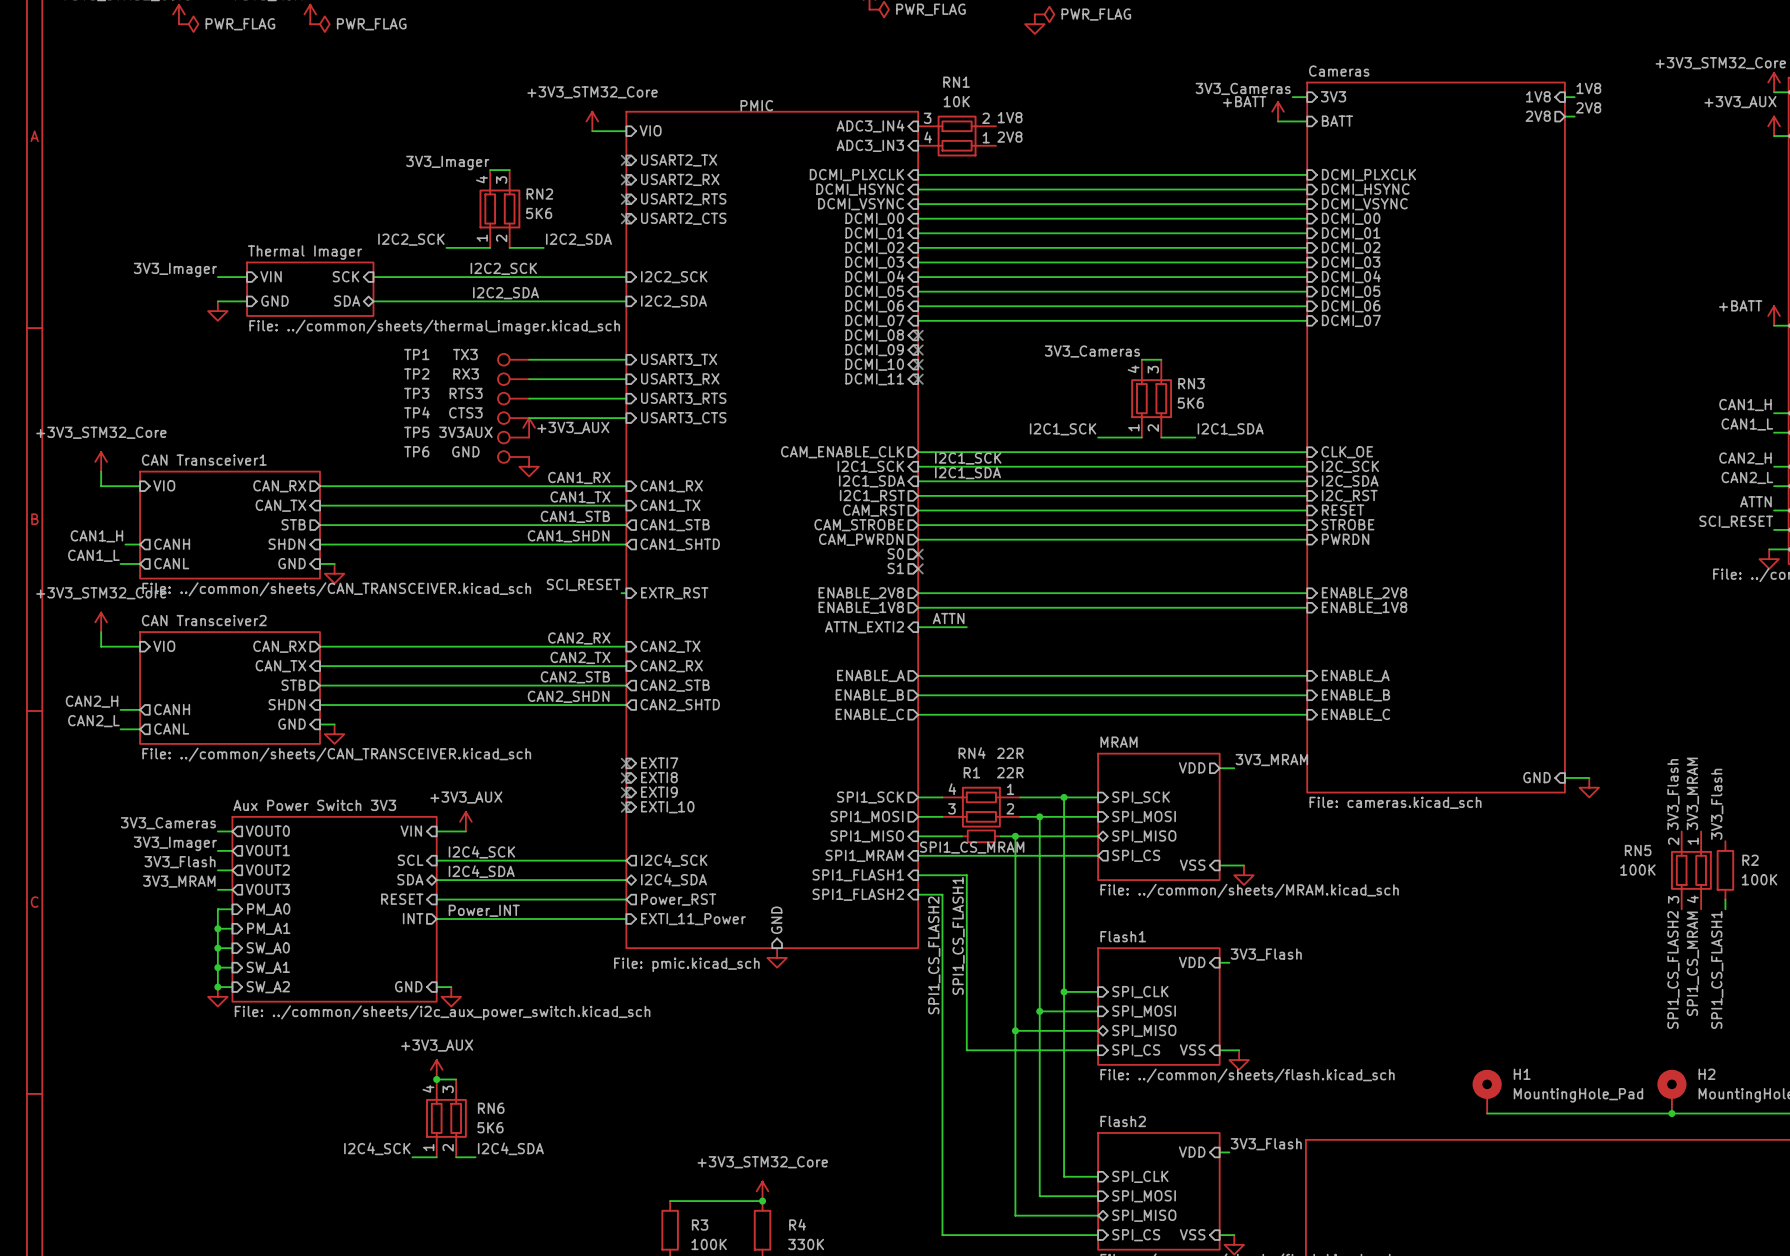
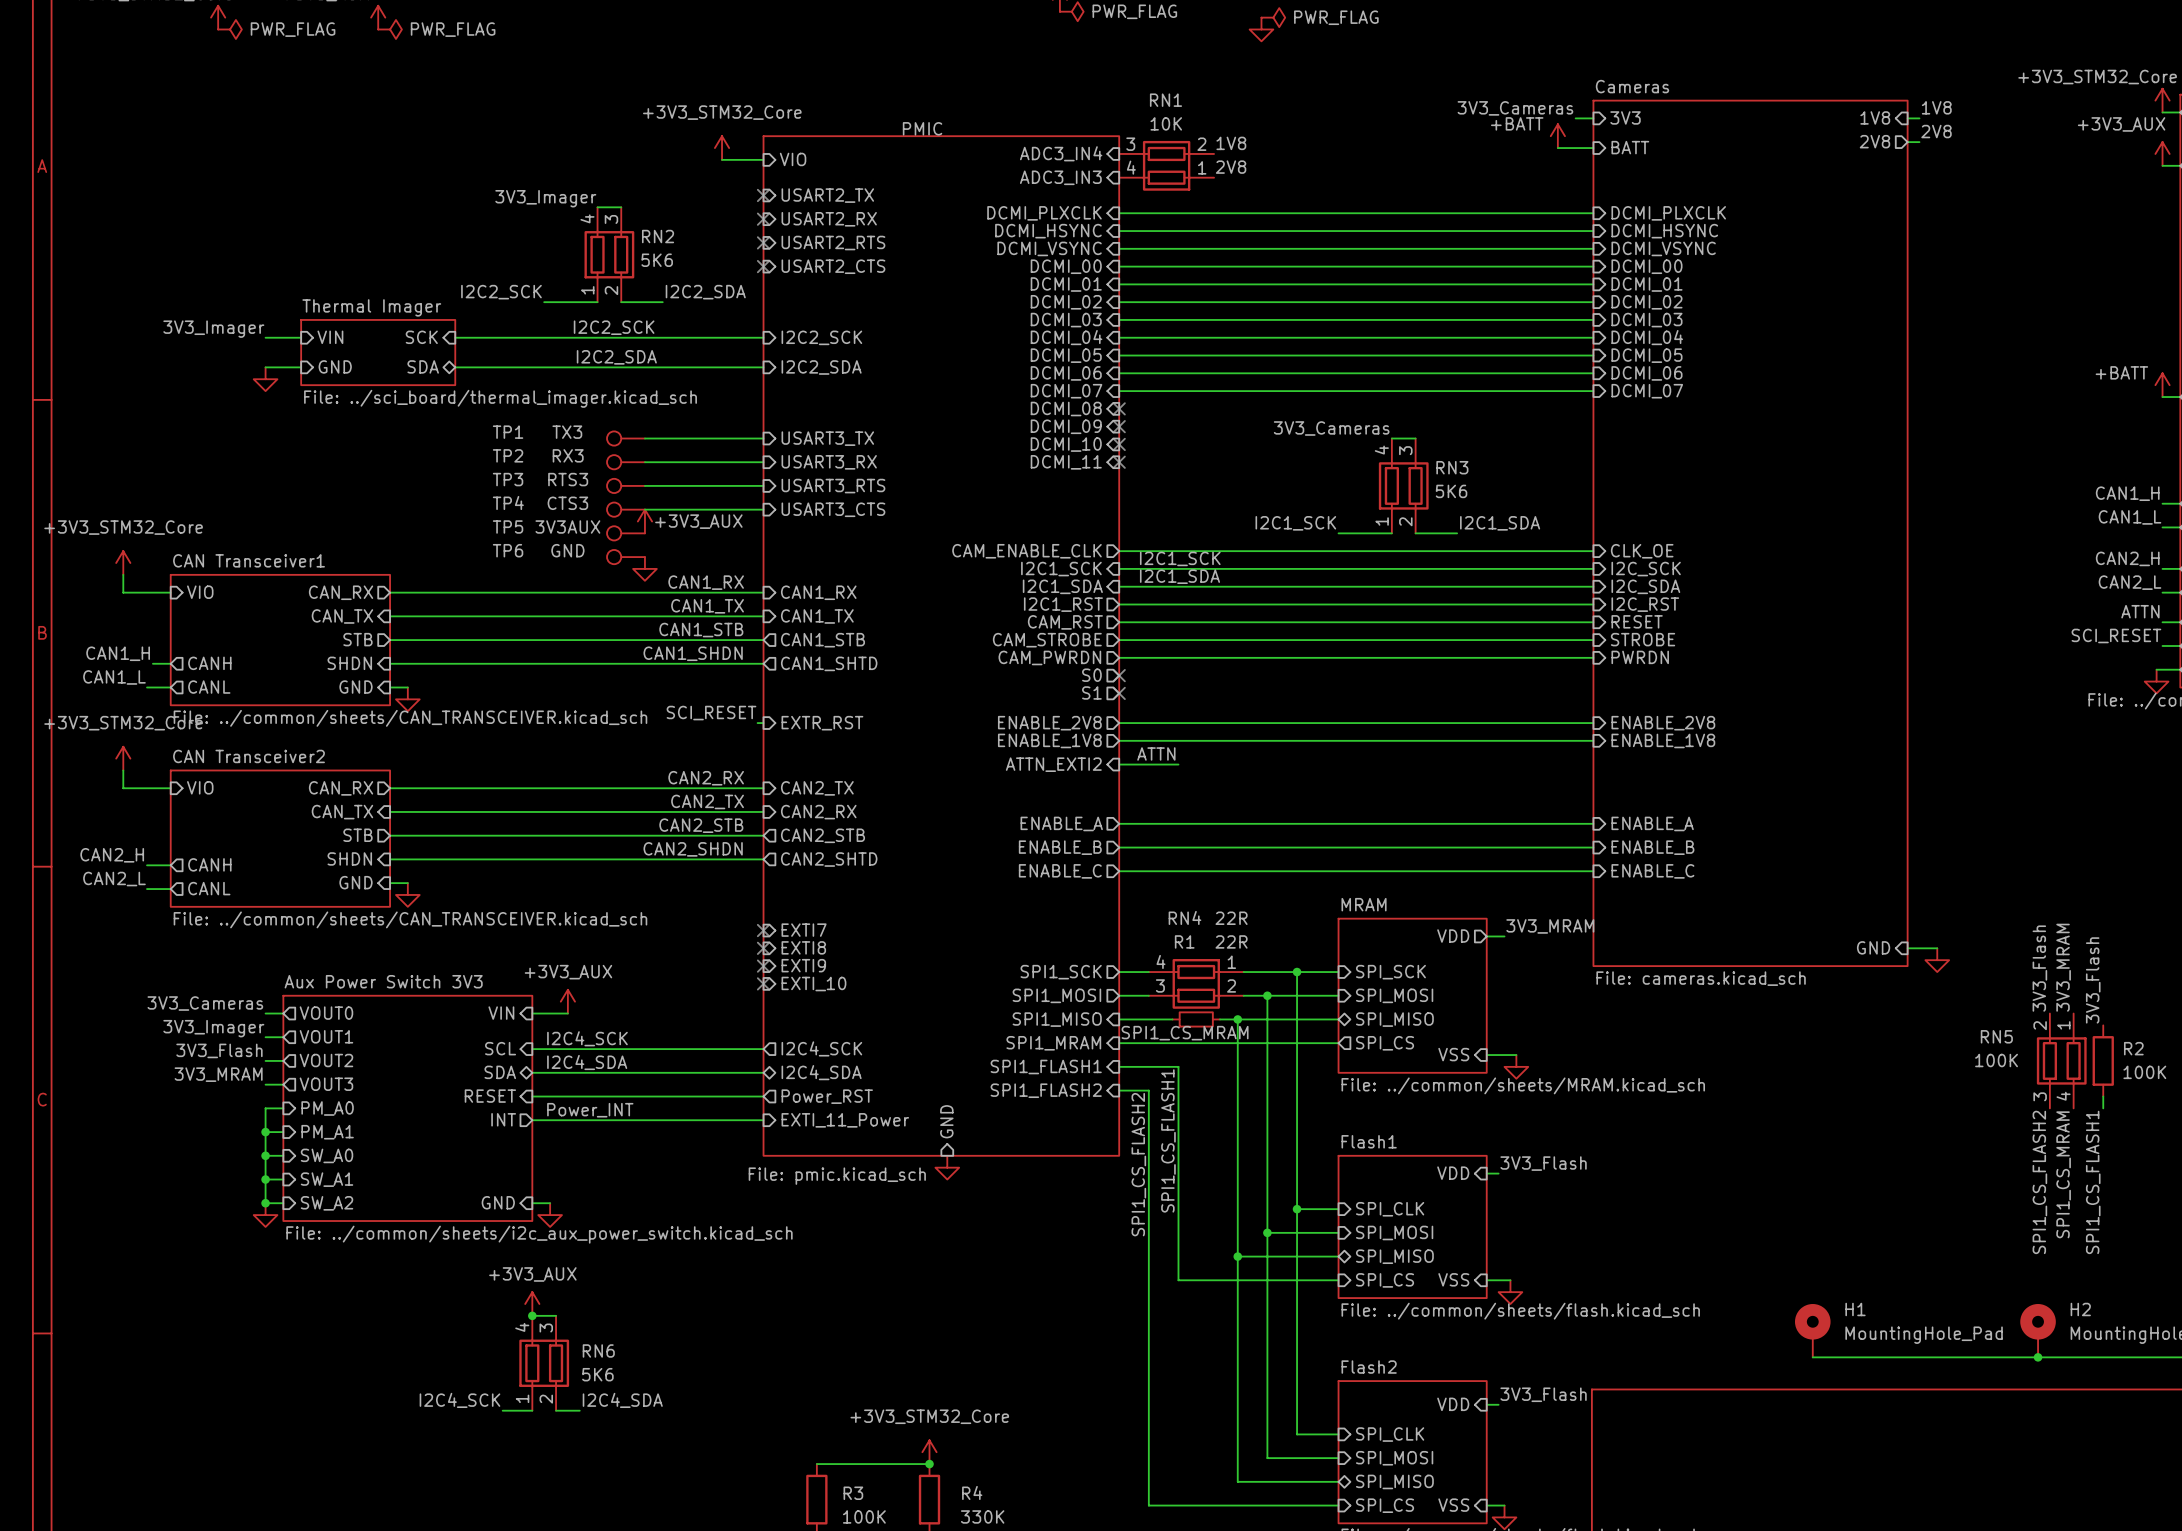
sheet Thermal Imager value: File: ../common/sheets/thermal_imager.kicad_sch (434, 327) -> File: ../sci_board/thermal_imager.kicad_sch (500, 398)

